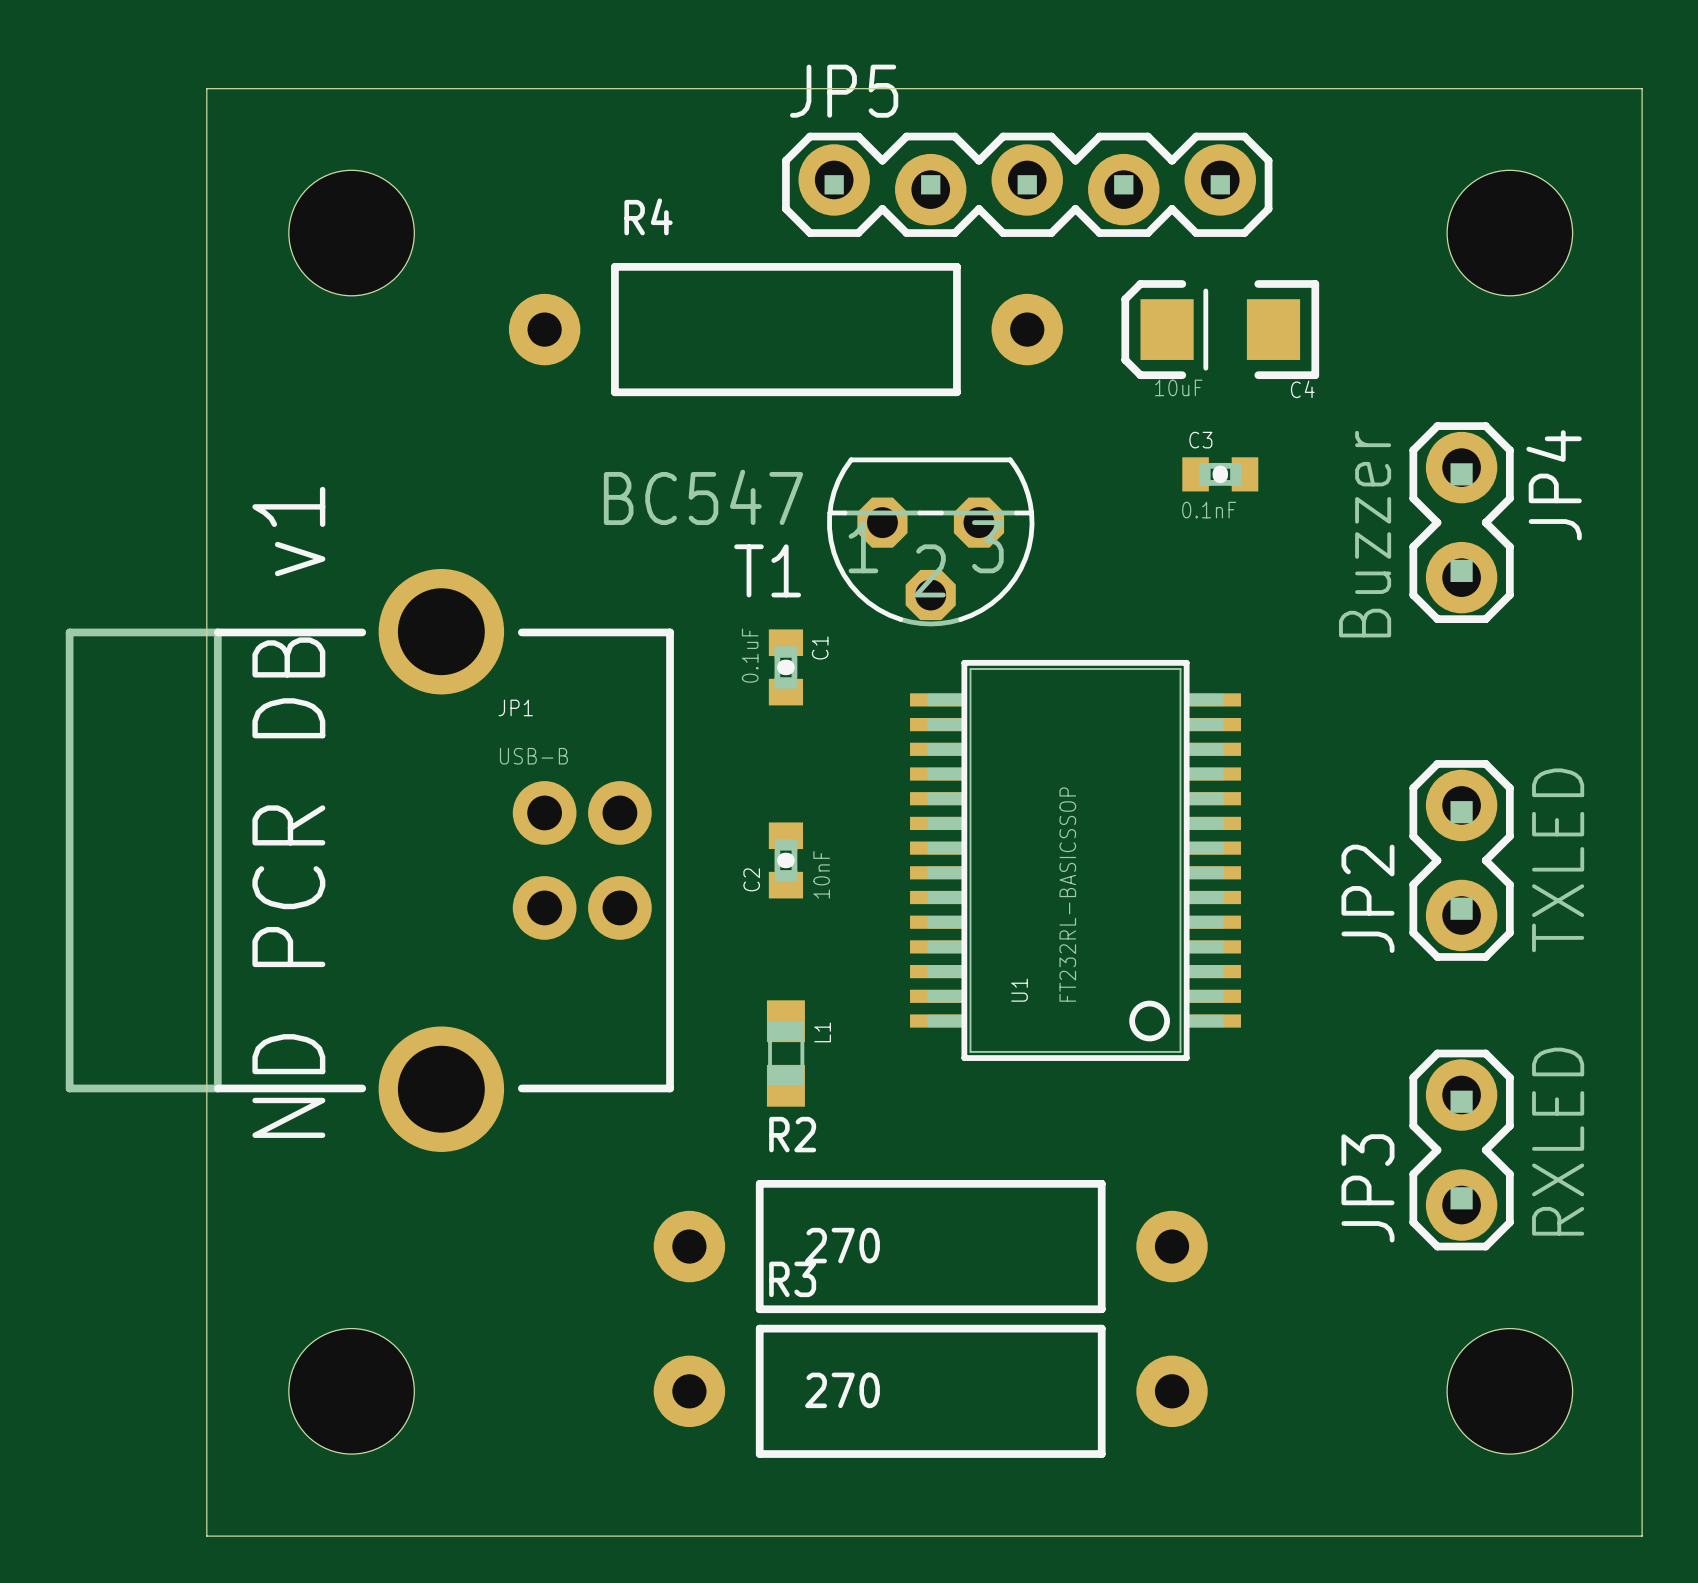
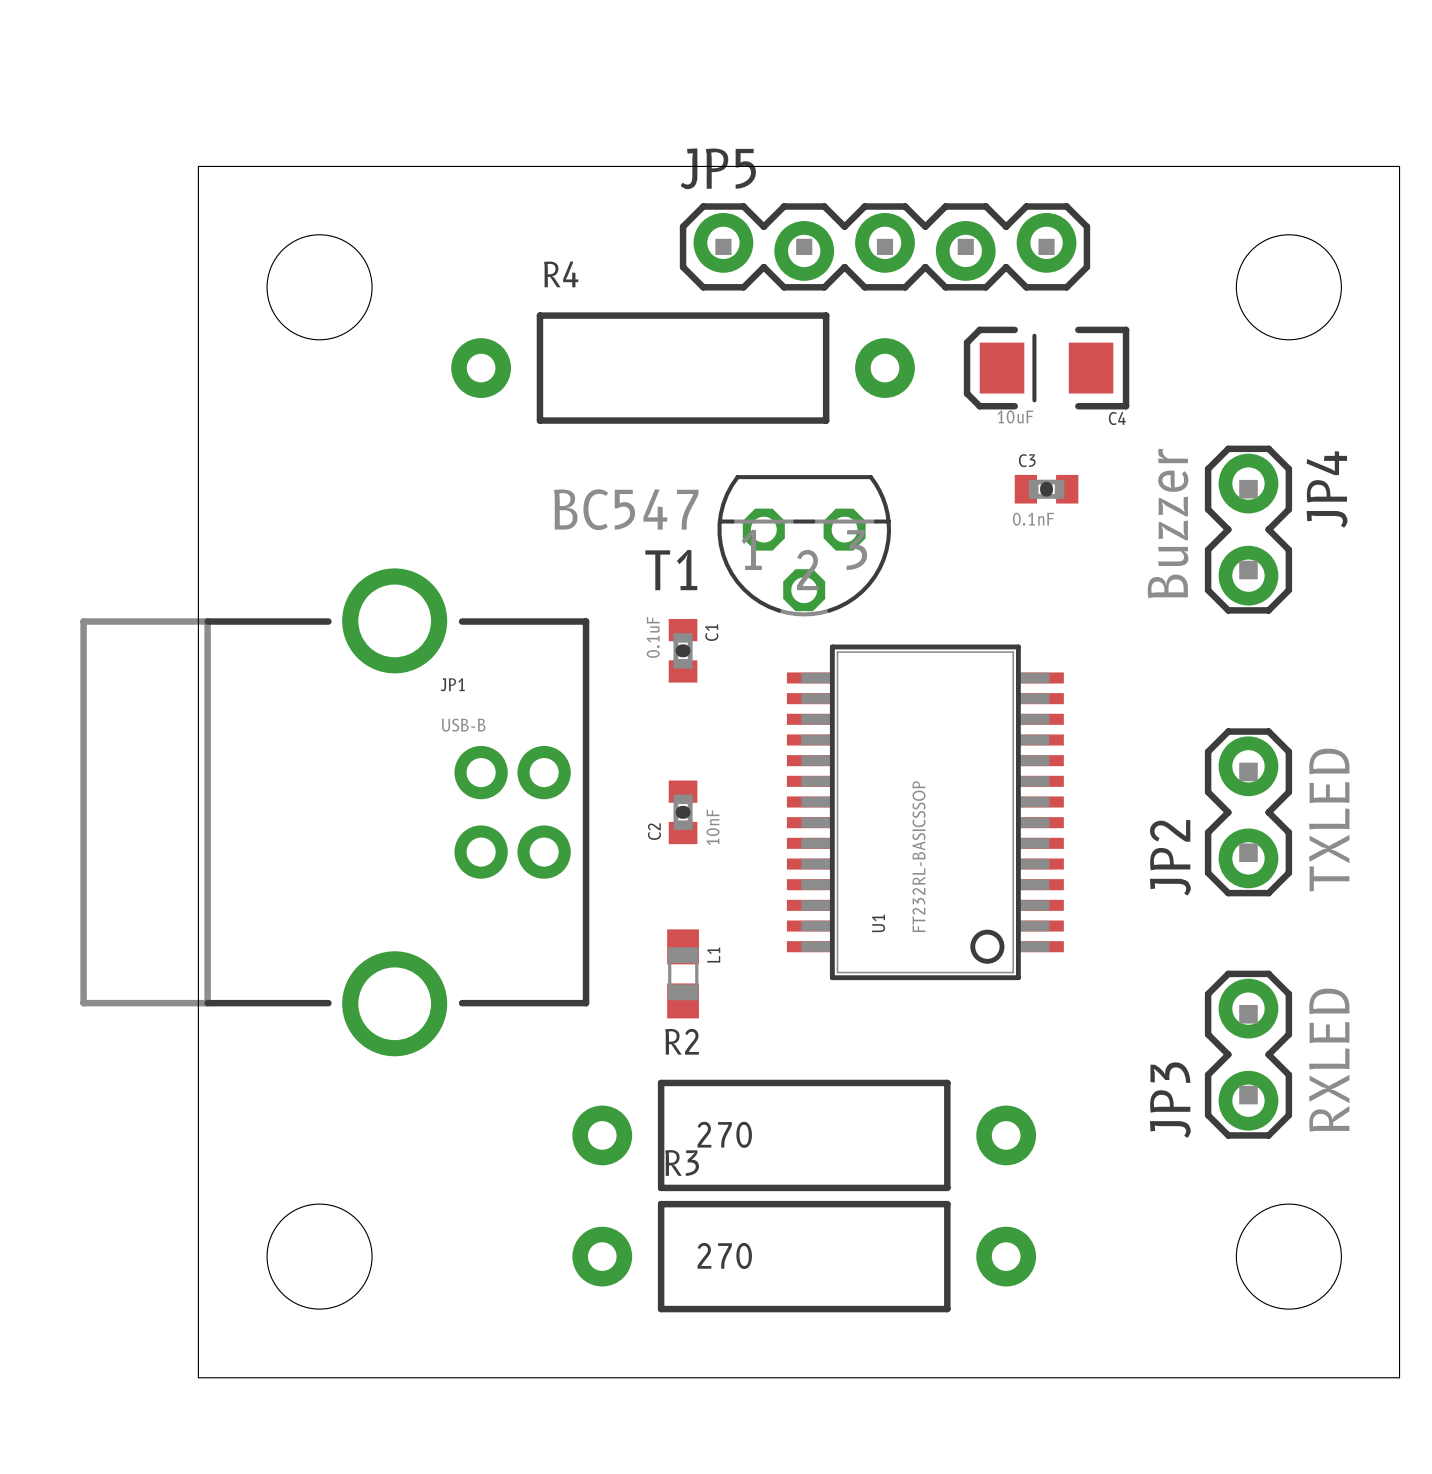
text: ND PCR DB v1 (288, 812) -> none

